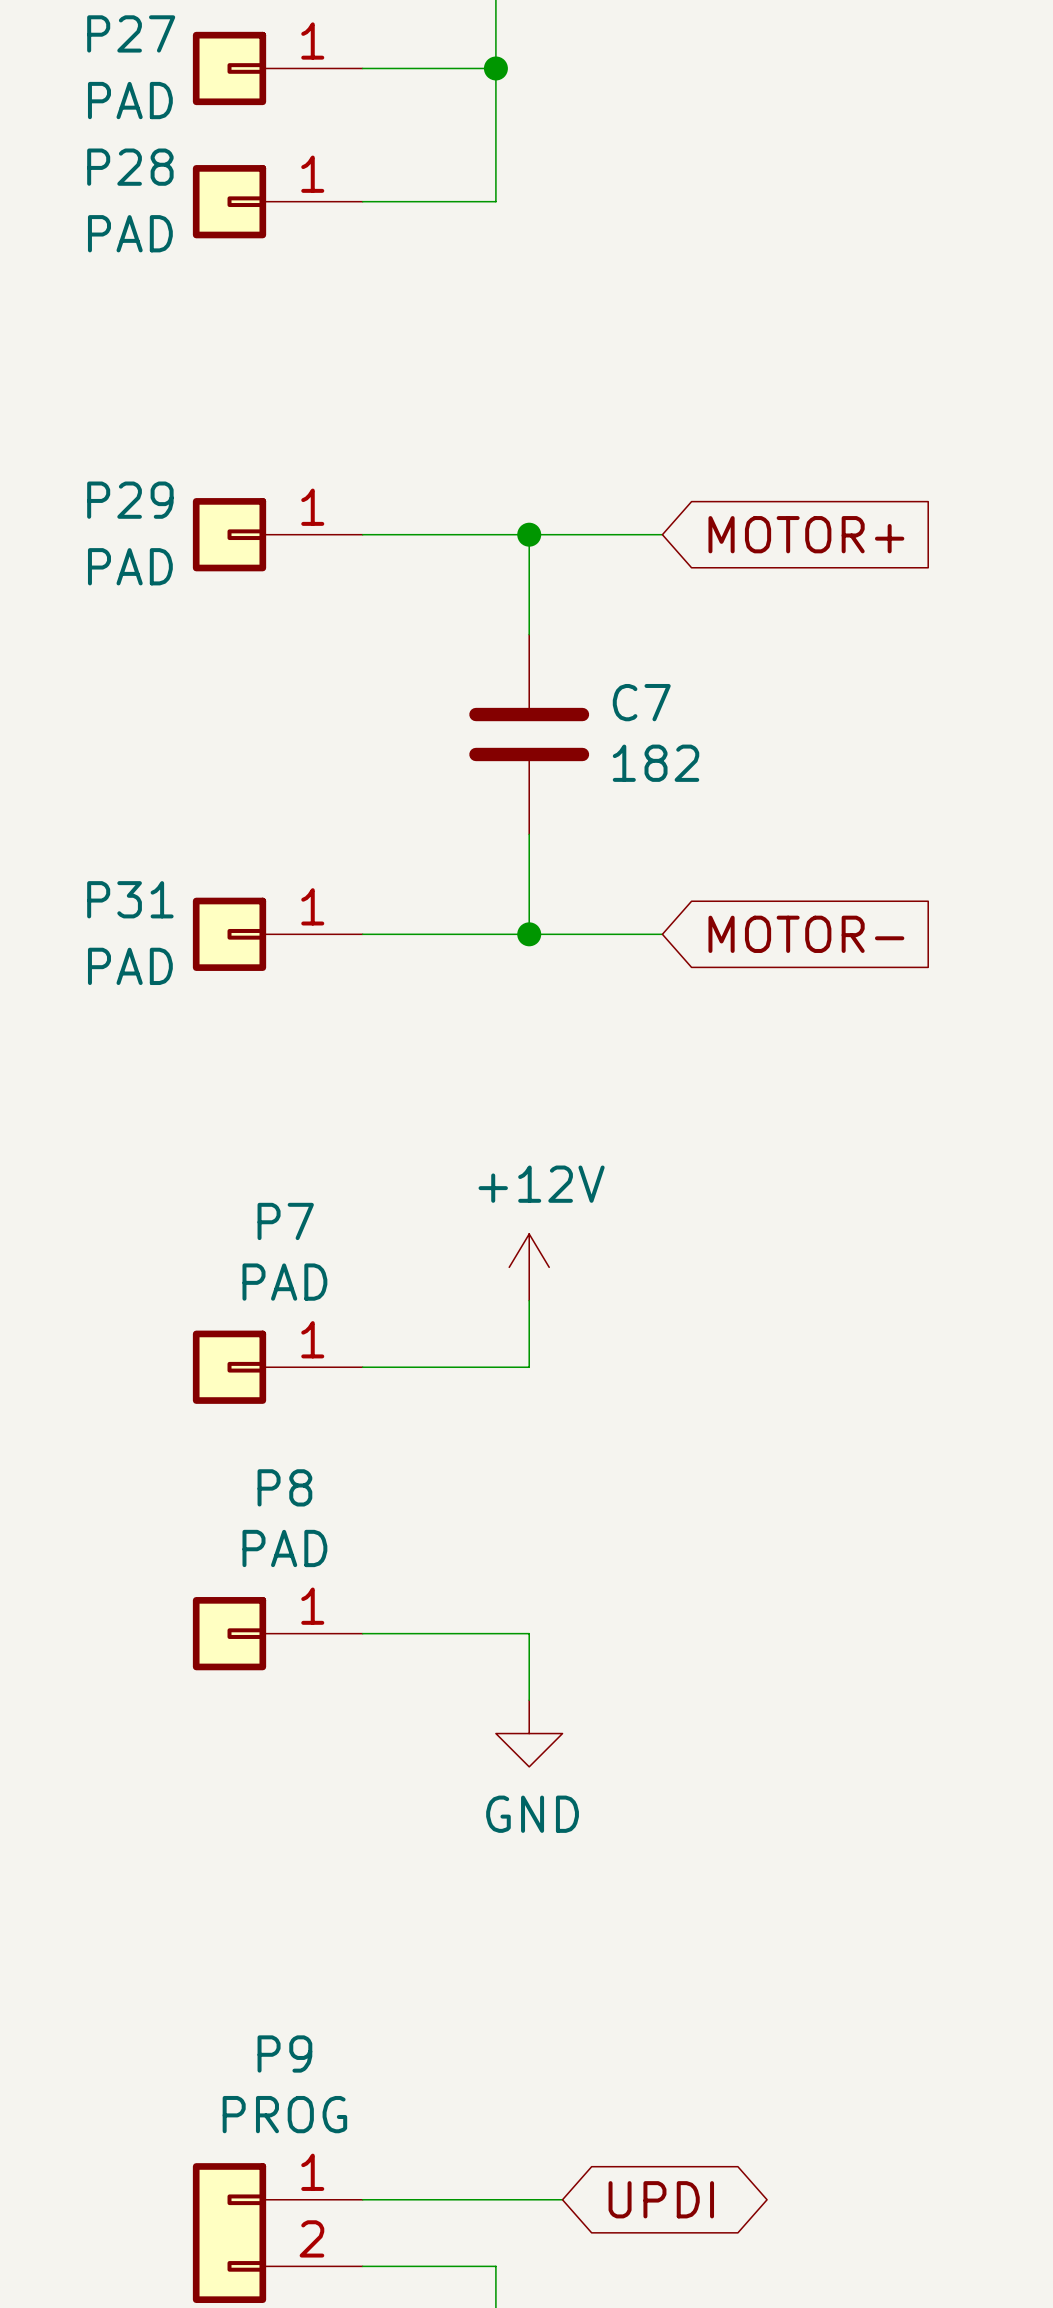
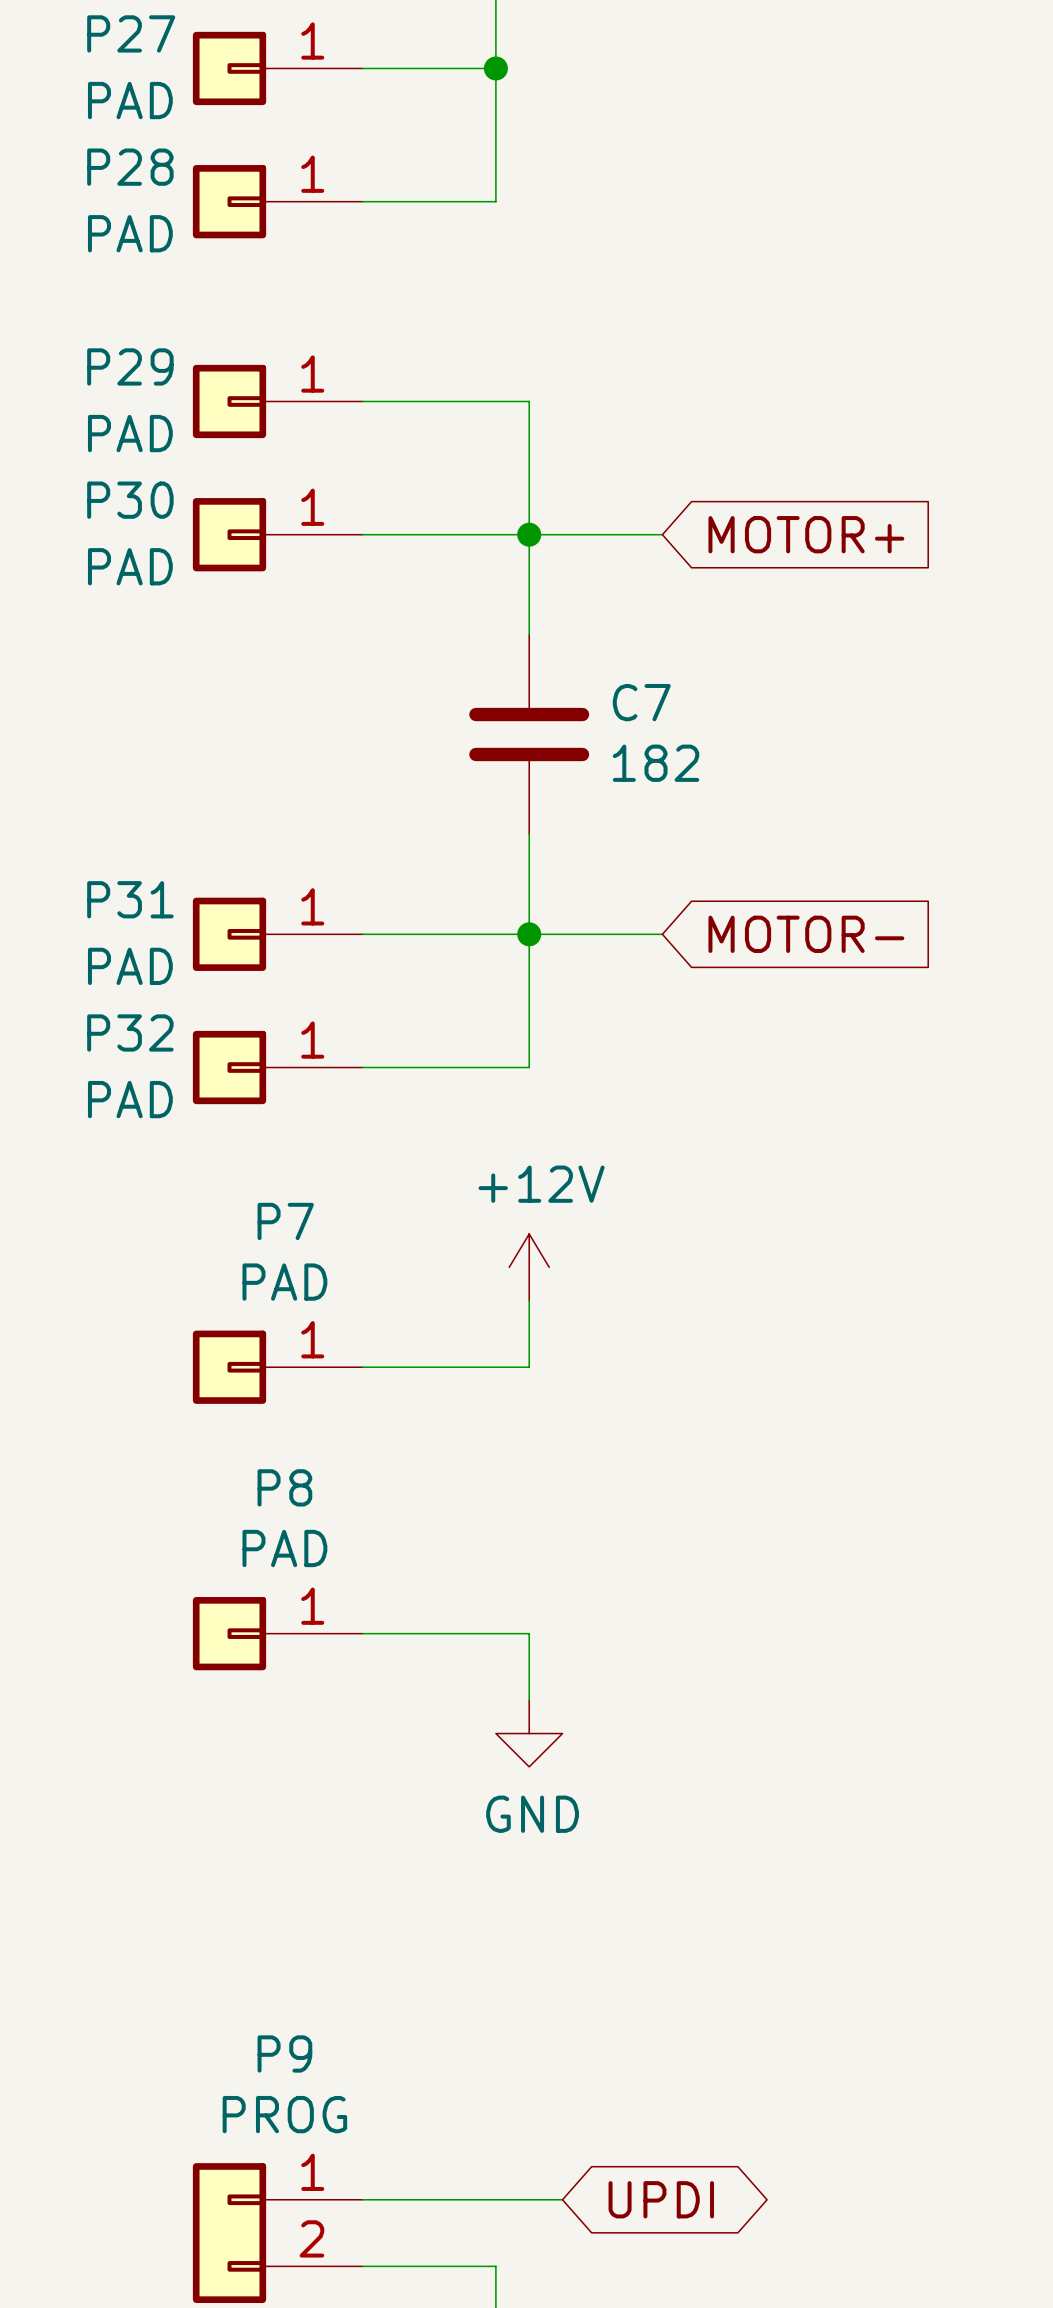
P29: none -> PAD (277, 401)
wire: none -> (362, 401) (529, 401) (529, 534)
P29 name: P29 (130, 500) -> P30 (130, 500)
wire: none -> (529, 934) (529, 1067) (362, 1067)
P32: none -> PAD (277, 1067)

